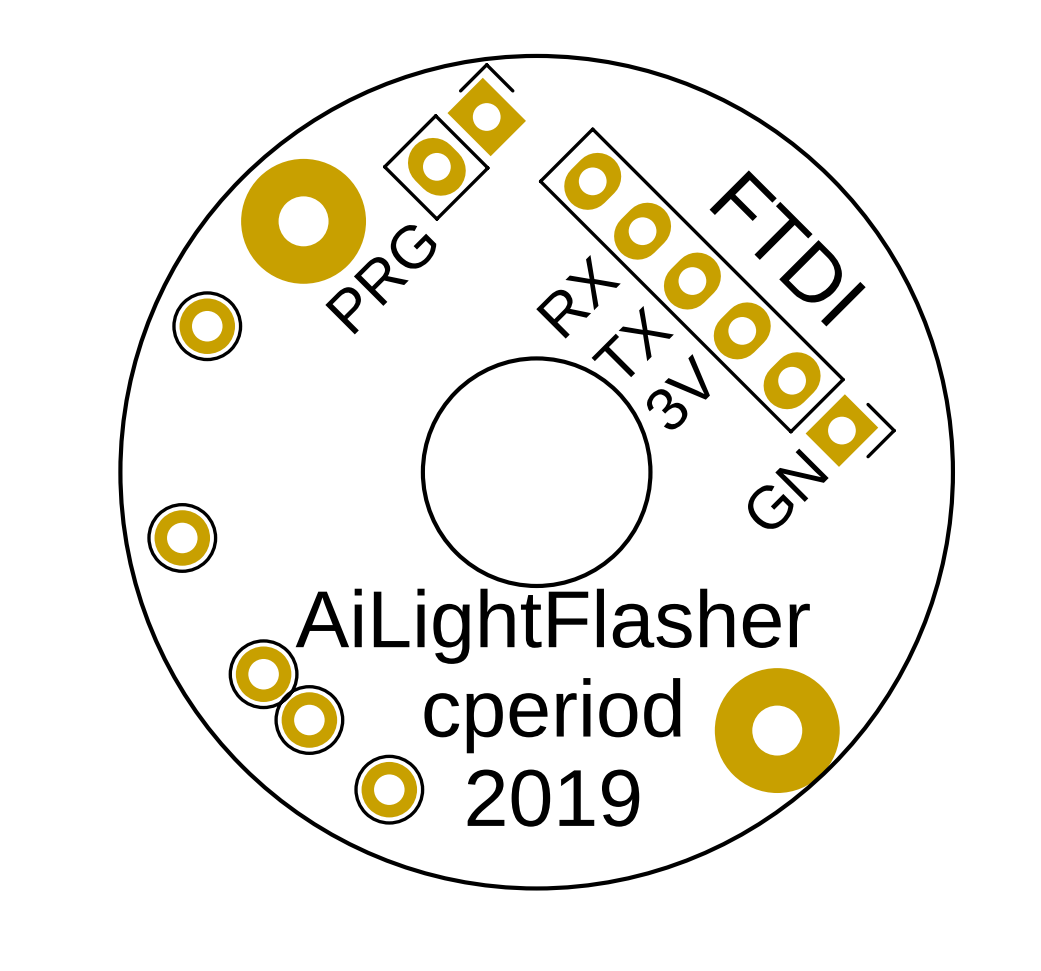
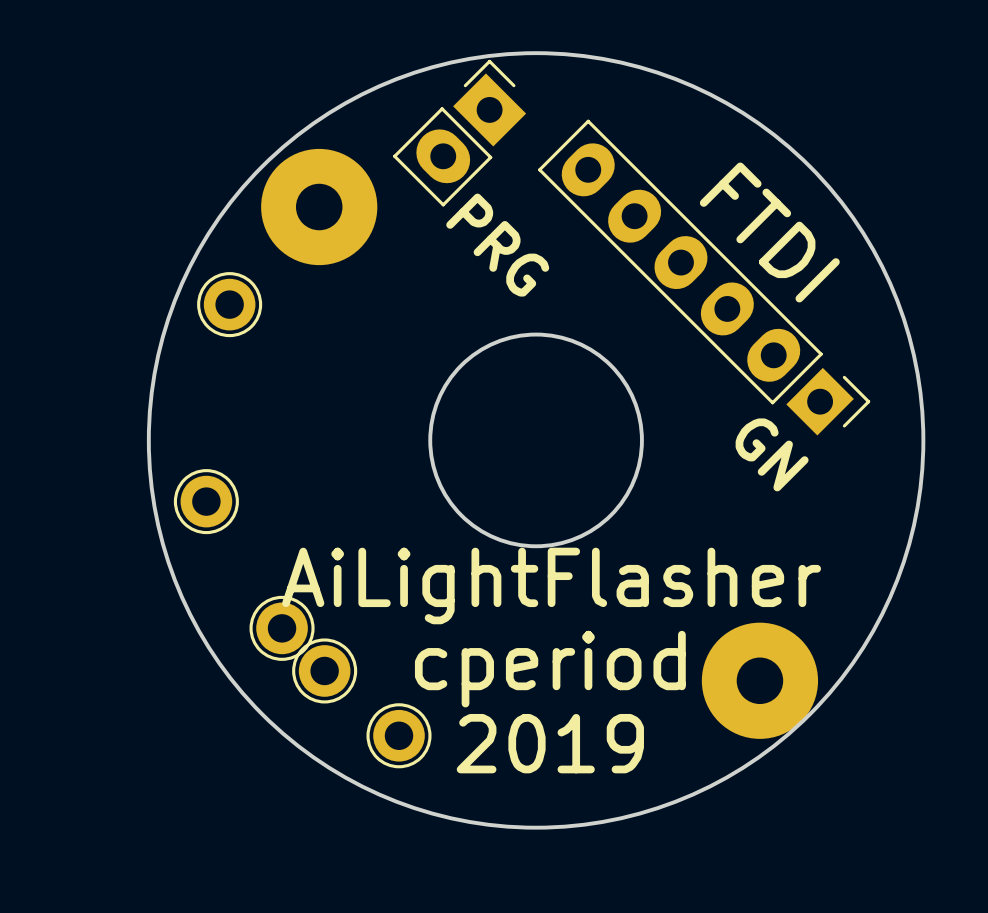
text rotation: 0° (380, 279) -> 90° clockwise (497, 245)
text: RX (578, 296) -> none
text: TX (632, 341) -> none
text: 3V (678, 392) -> none
text rotation: 0° (788, 489) -> 90° clockwise (772, 454)

